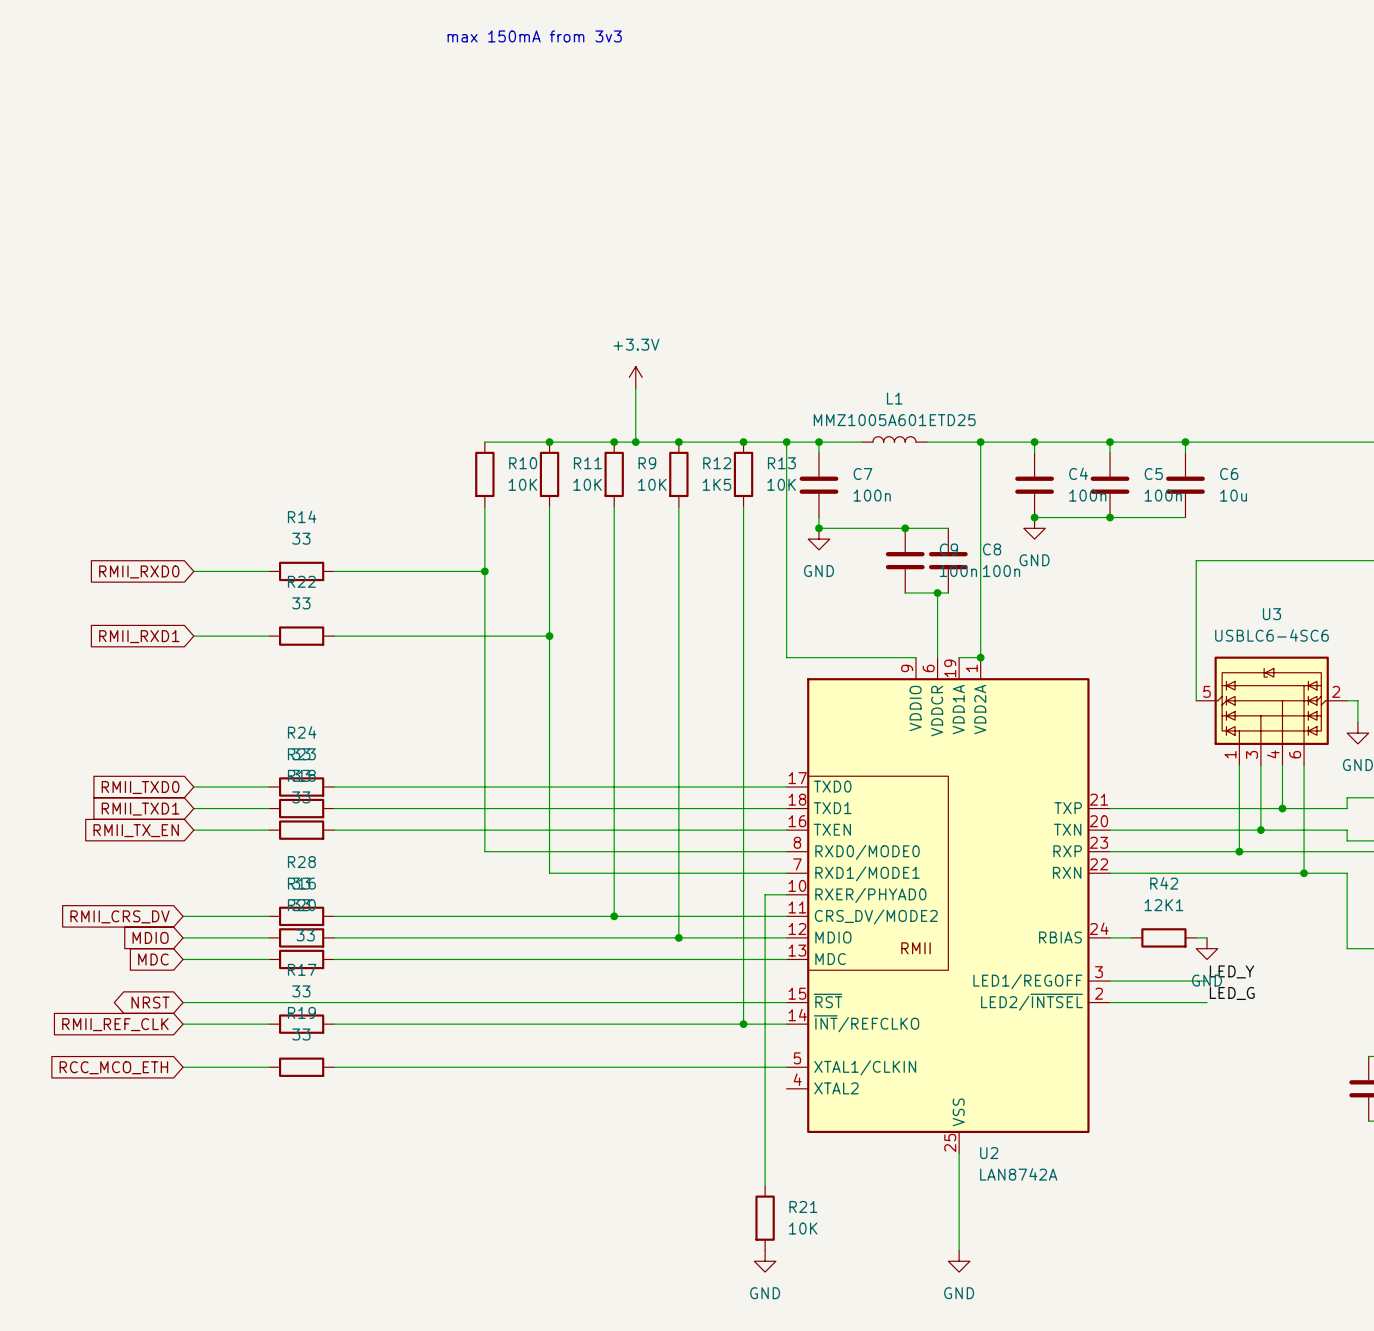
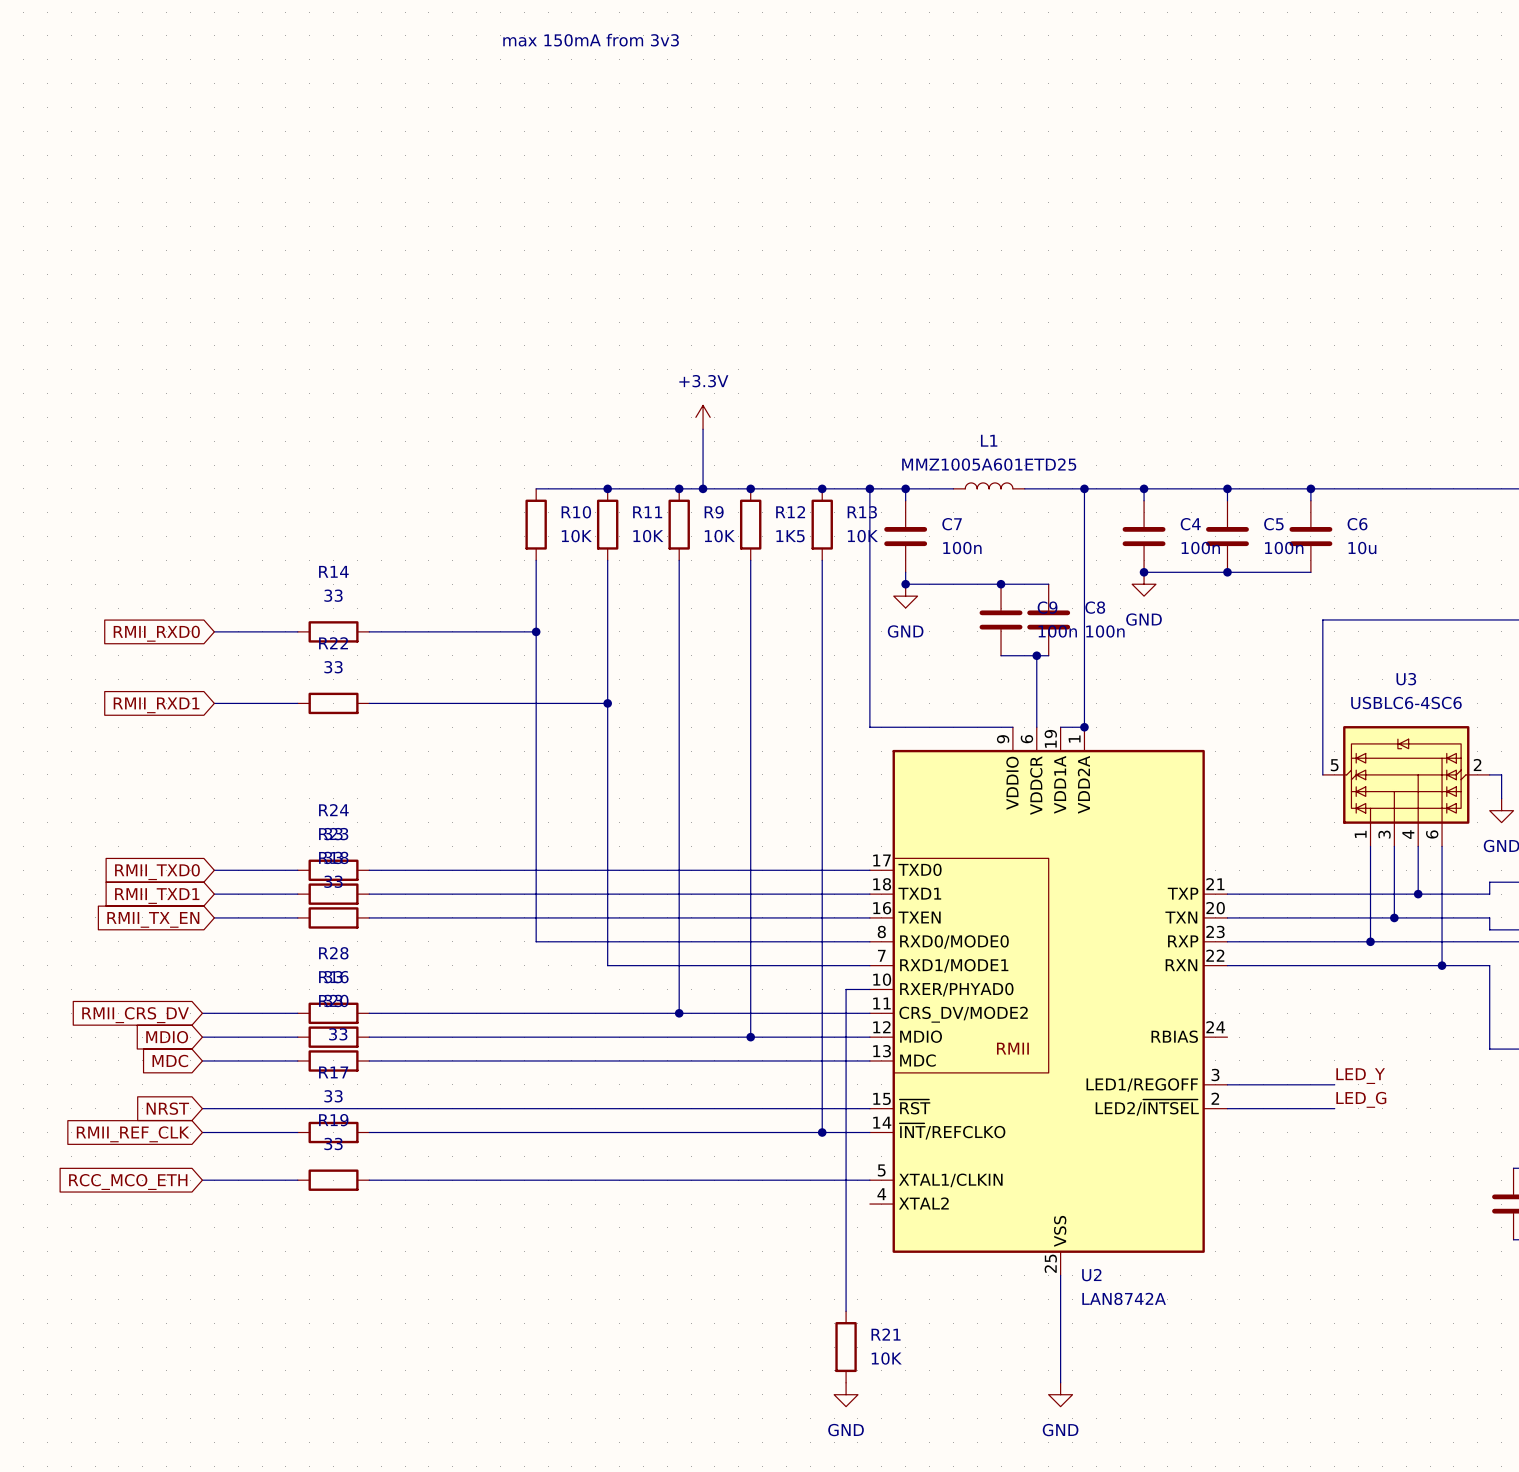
wire: (1110, 937) (1131, 937) -> none
R42: 12K1 (1163, 937) -> none
wire: (1196, 937) (1207, 937) -> none
power symbol: GND (1207, 948) -> none
global label shape: bidirectional (150, 1002) -> input (167, 1108)

